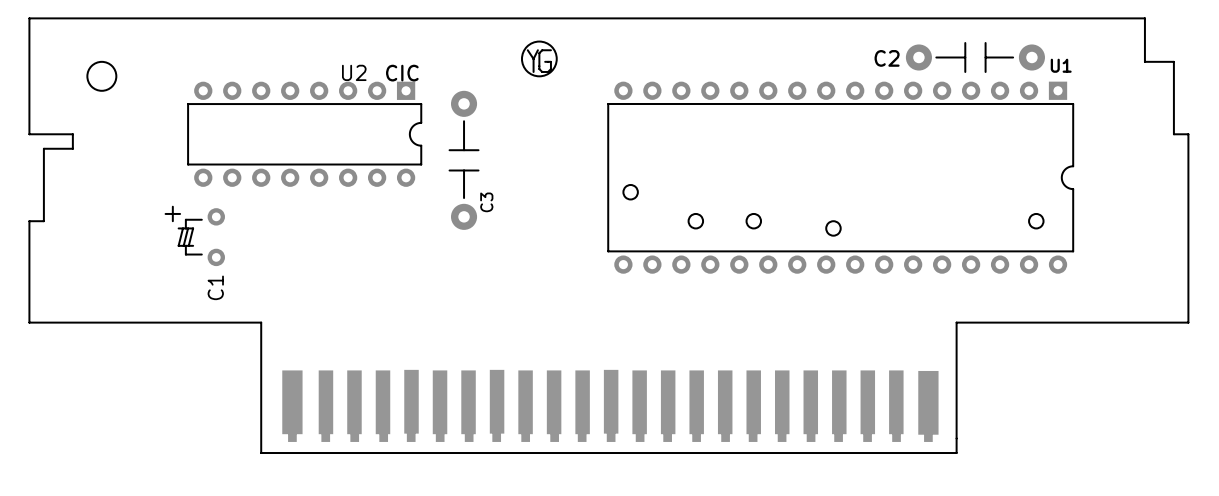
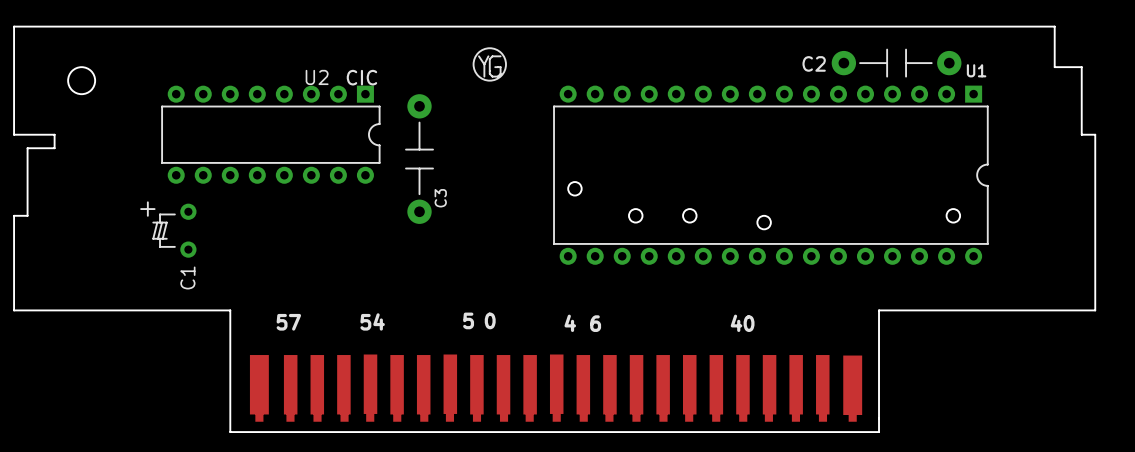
text: none -> 5 (468, 320)
text: none -> 0 (490, 320)
text: none -> 54 (372, 321)
text: none -> 57 (288, 322)
text: none -> 4 (570, 323)
text: none -> 6 (595, 323)
text: none -> 40 (742, 323)

